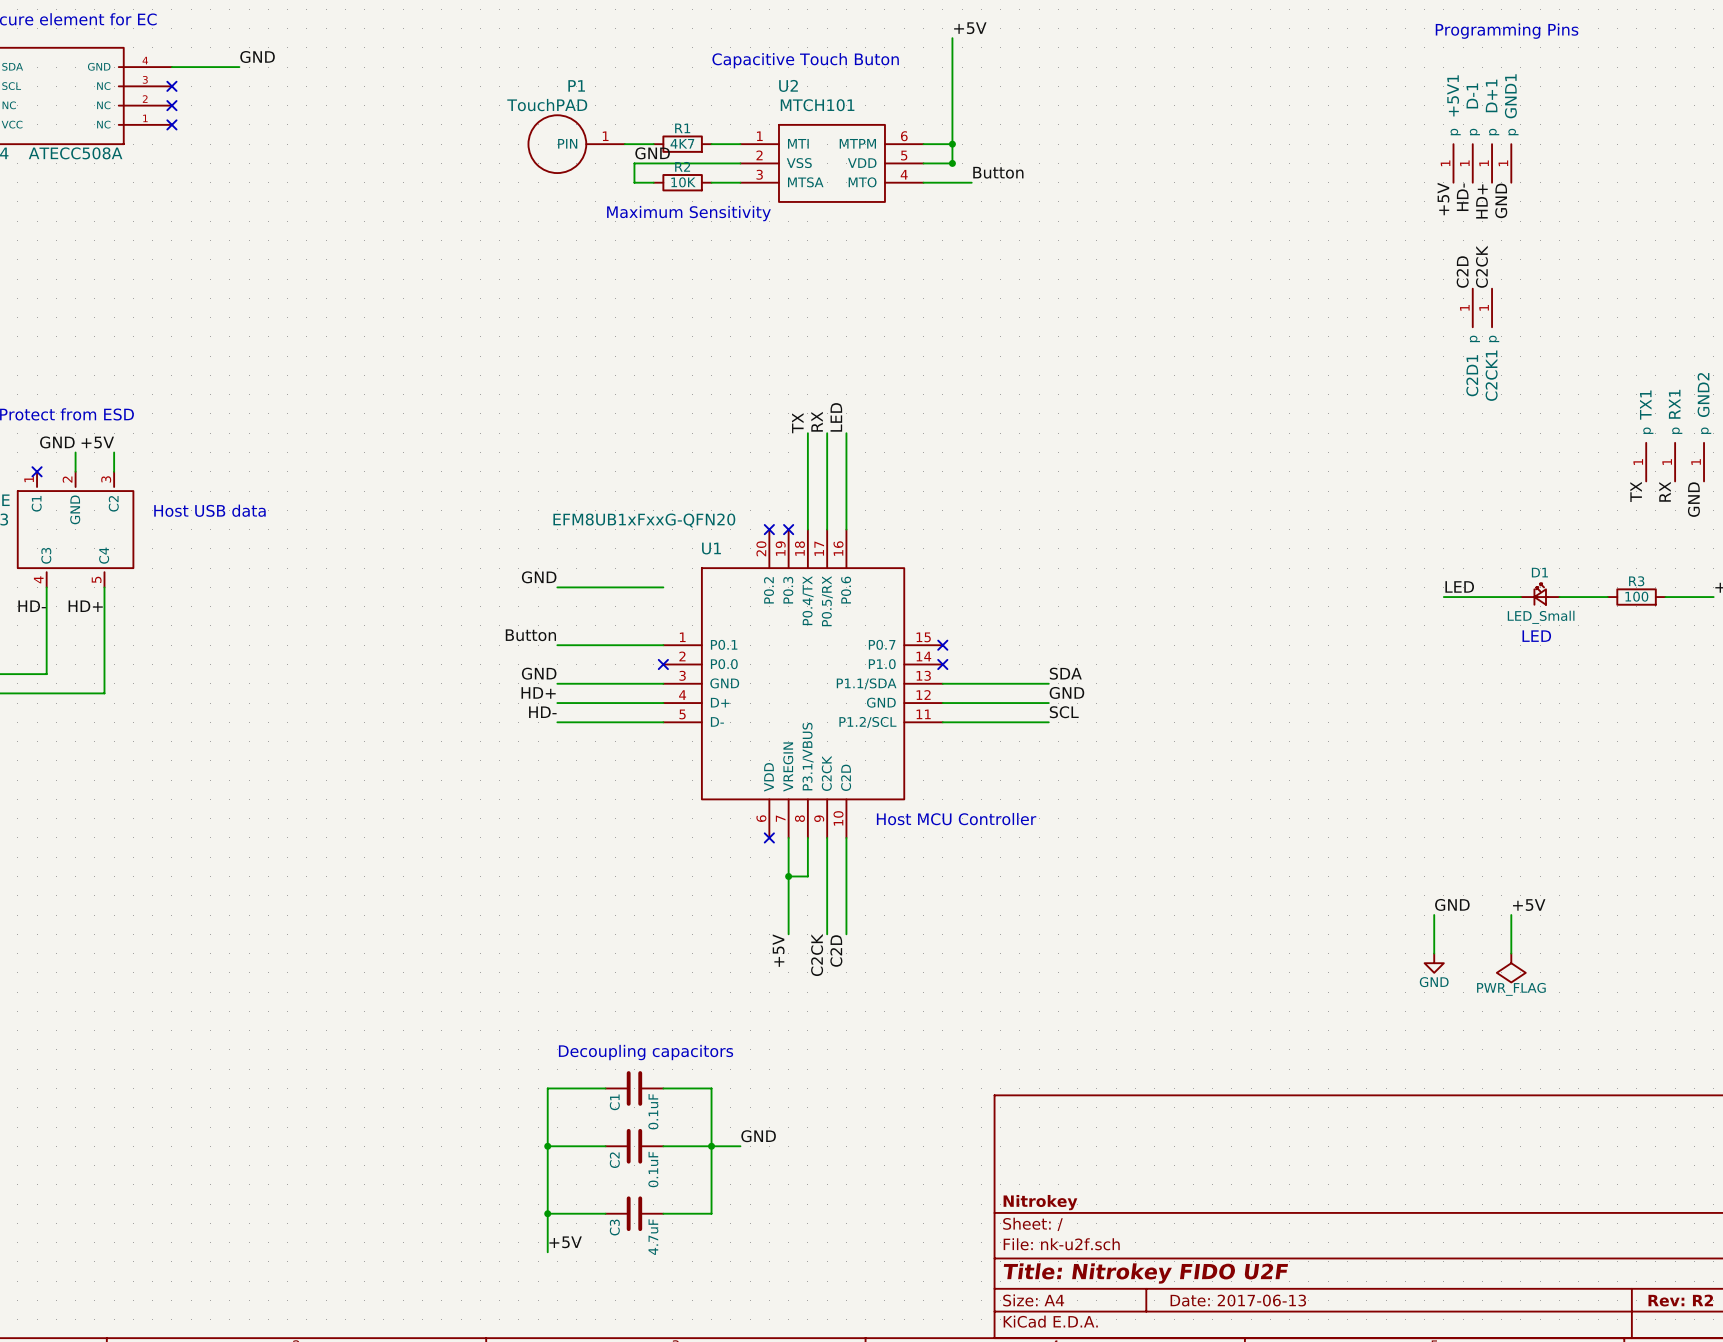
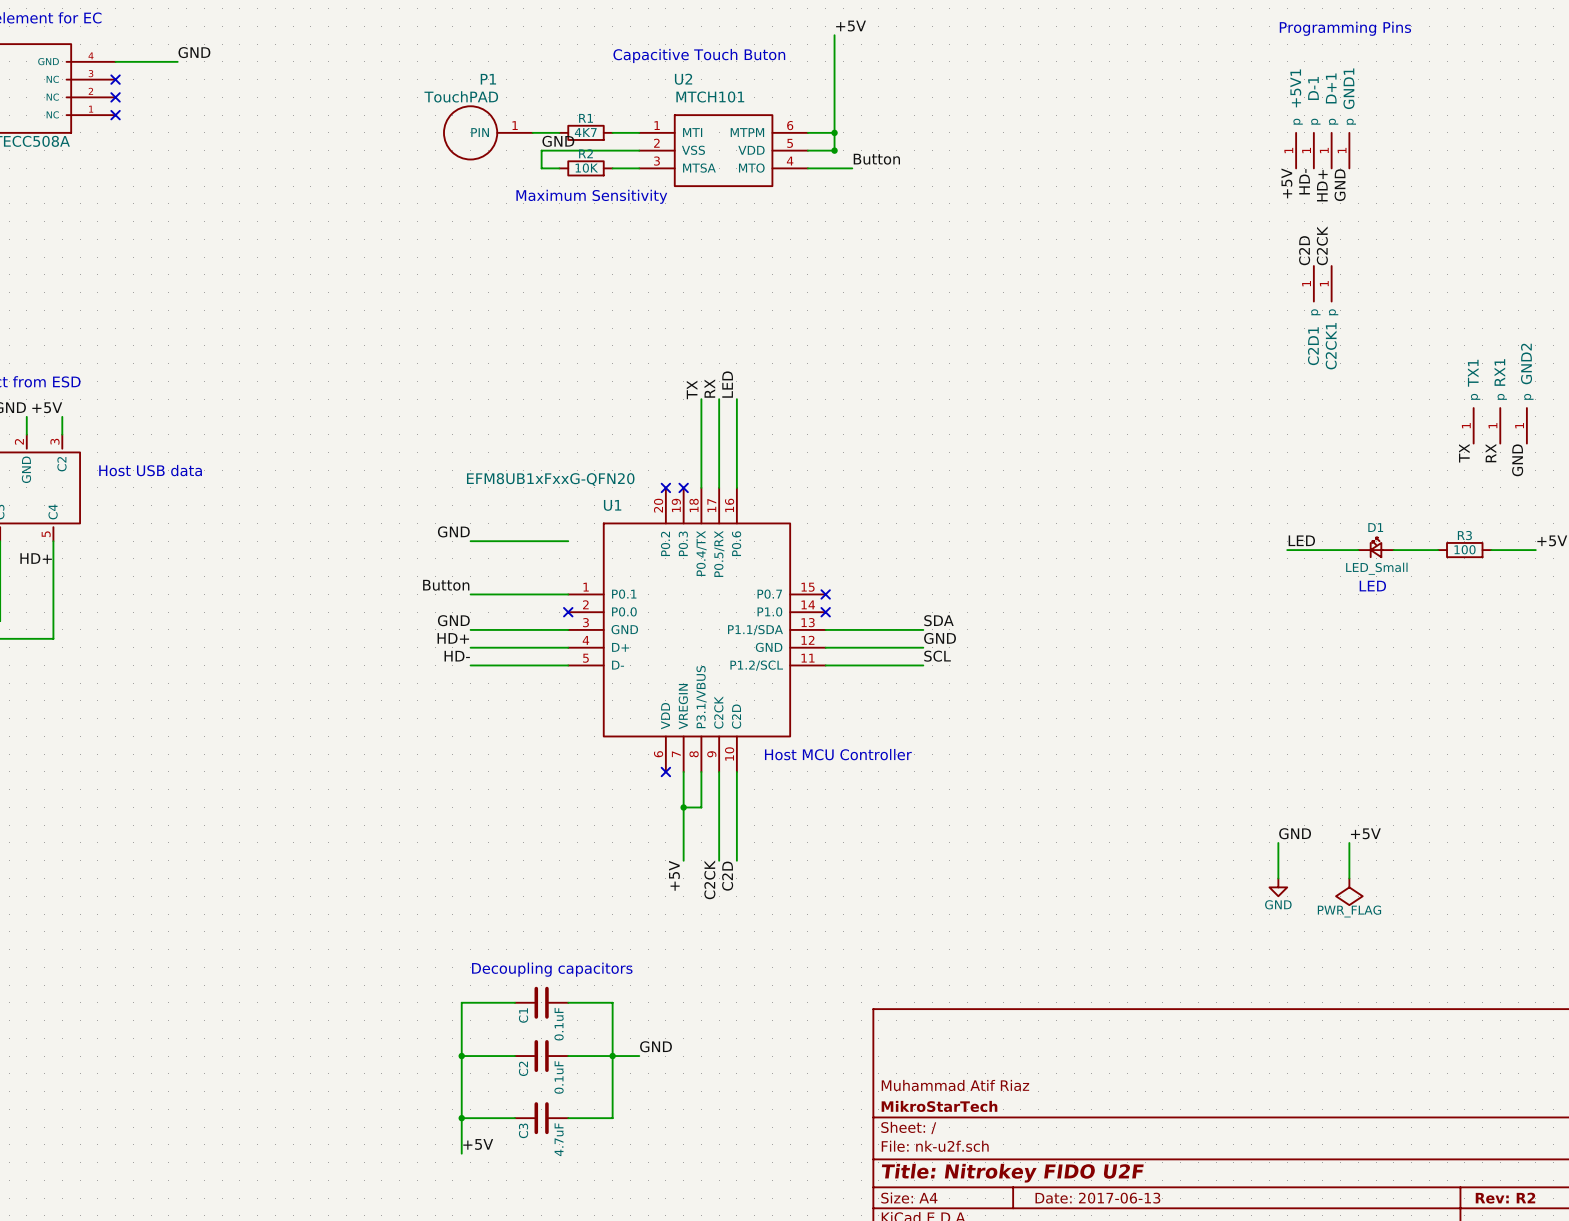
title block: none -> Muhammad Atif Riaz (955, 1085)
title block: Nitrokey (1040, 1202) -> MikroStarTech (939, 1106)

